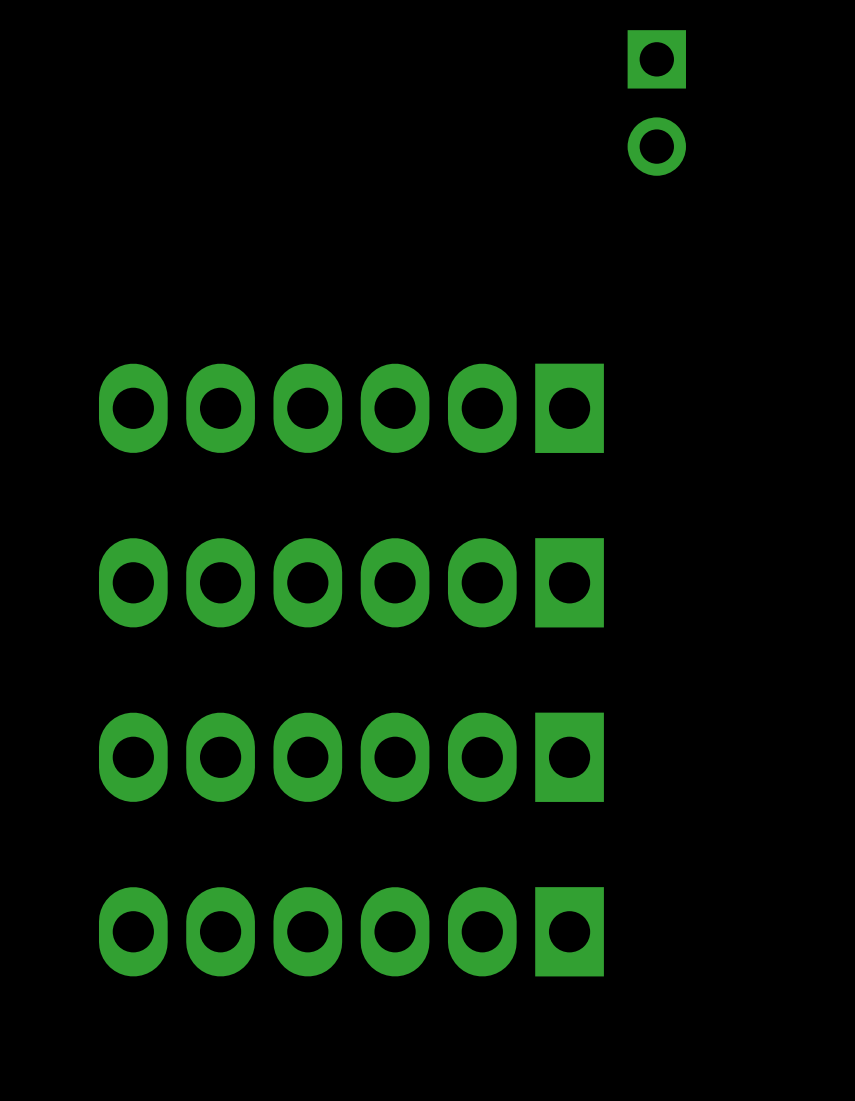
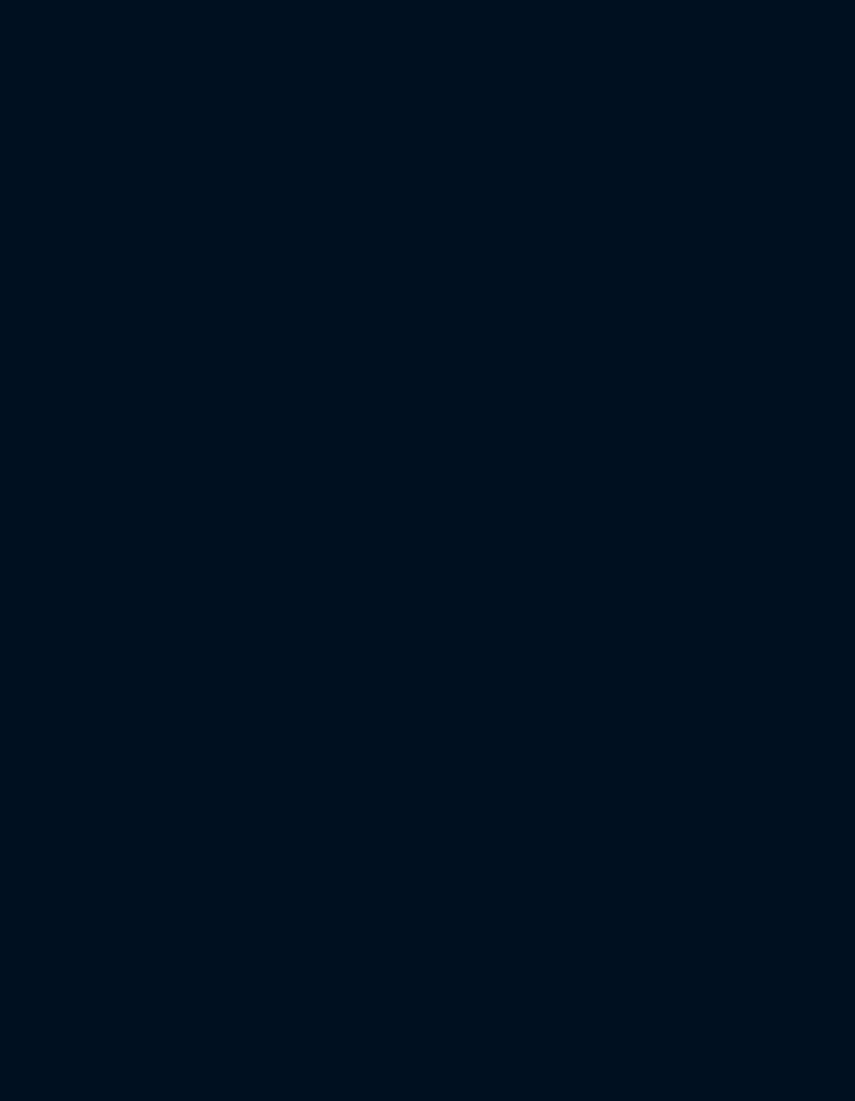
part: (656, 102) -> none
part: (351, 408) -> none
part: (351, 582) -> none
part: (351, 757) -> none
part: (351, 931) -> none

